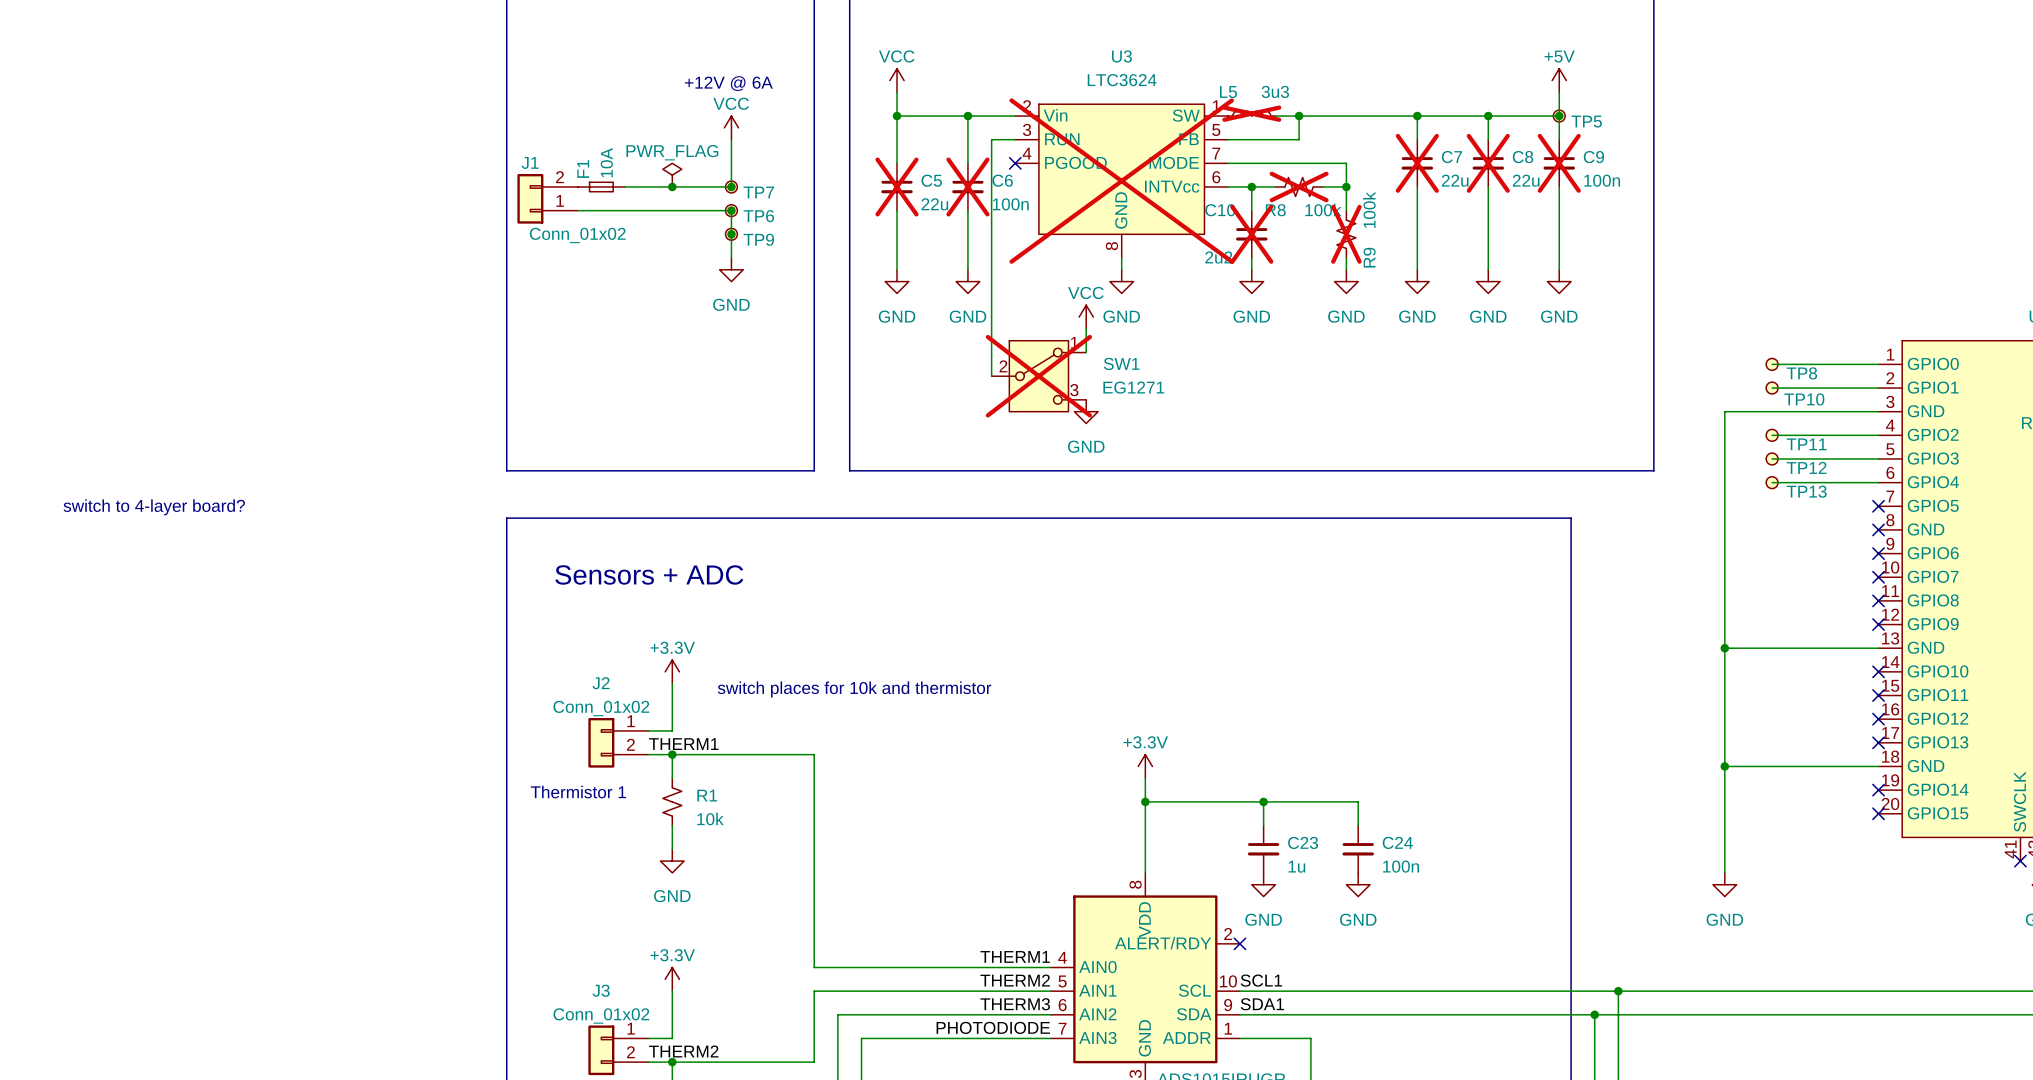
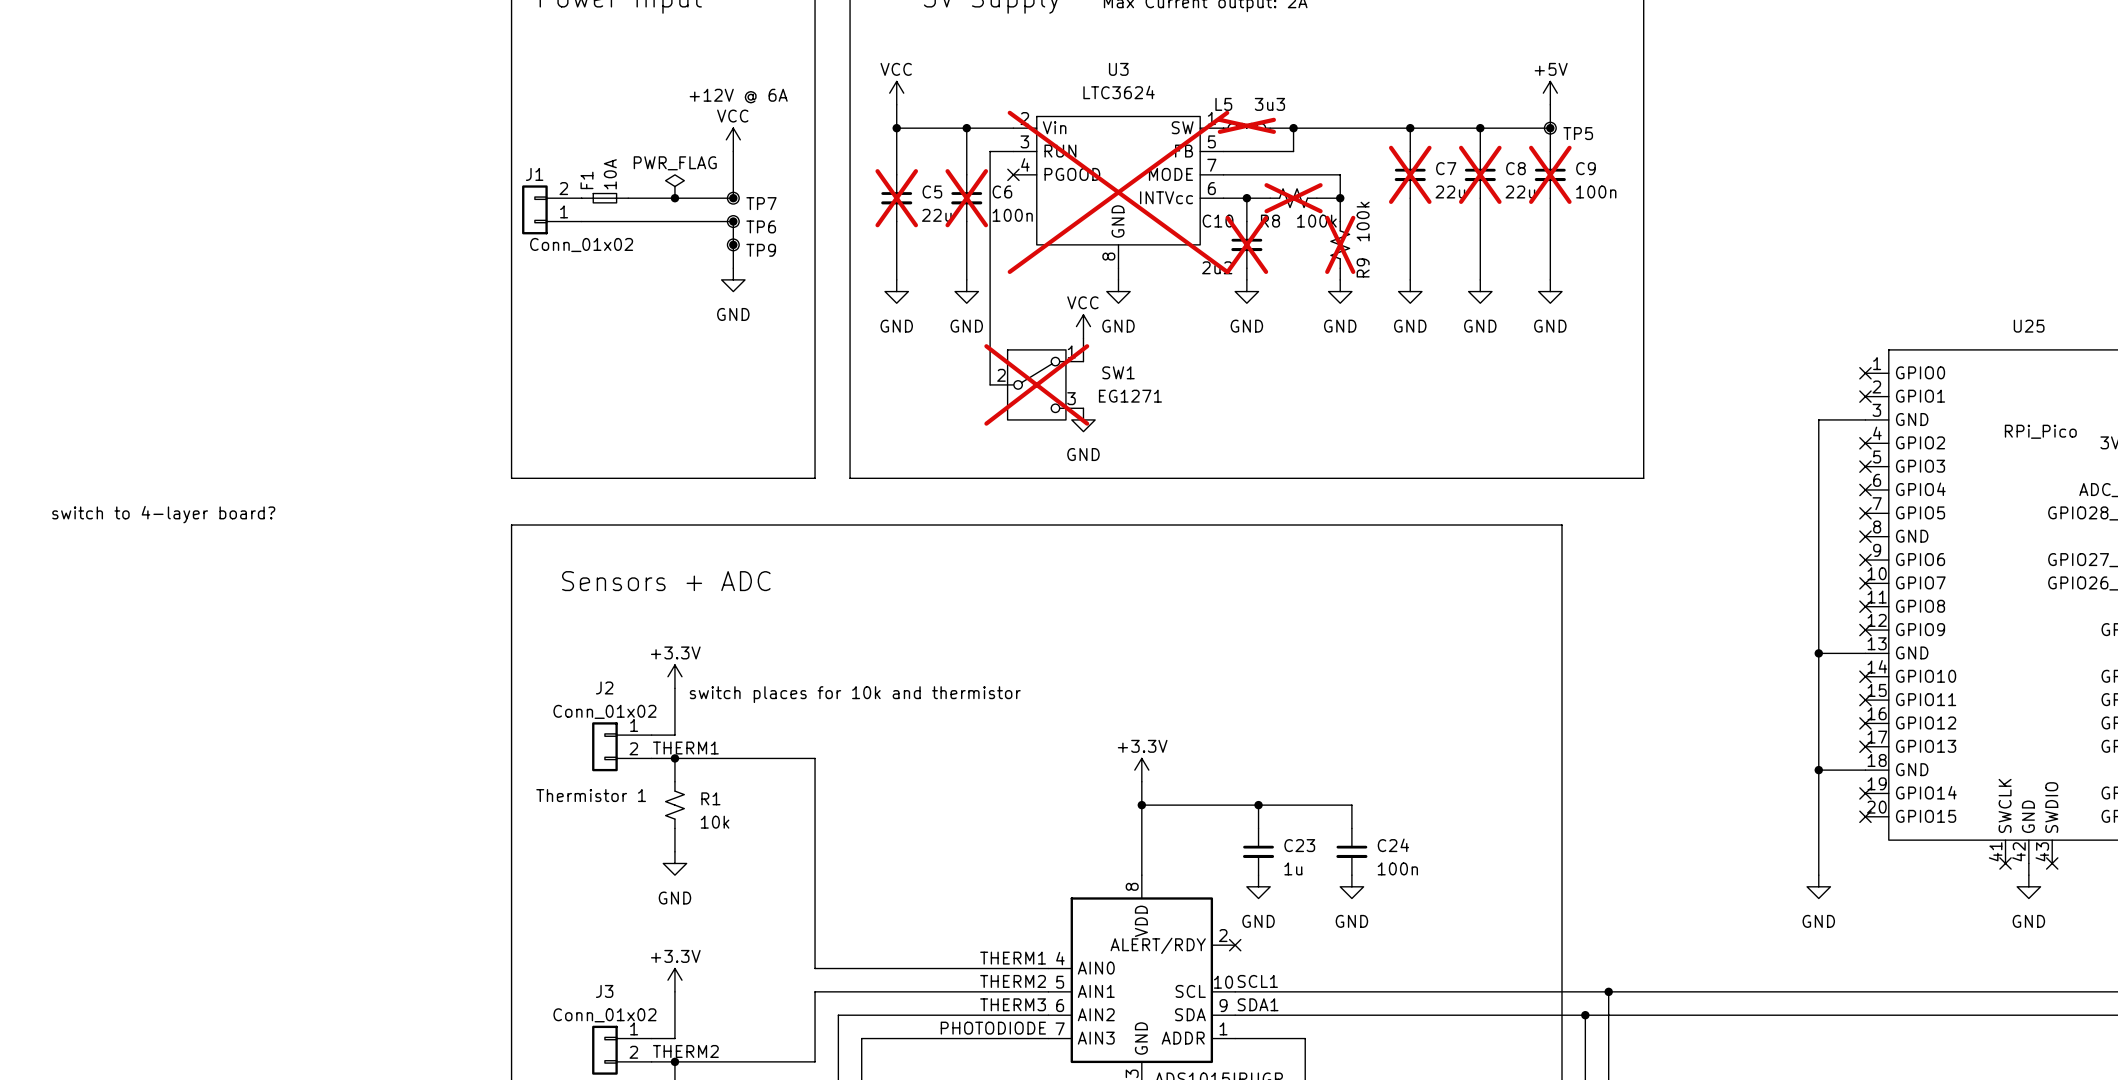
wire: (1772, 364) (1878, 364) -> none
TP8: (1772, 364) -> none
no-connect mark: none -> (1865, 373)
wire: (1772, 388) (1878, 388) -> none
TP10: (1772, 388) -> none
no-connect mark: none -> (1865, 396)
wire: (1831, 411) (1724, 411) (1724, 872) -> (1818, 419) (1818, 875)
wire: (1772, 435) (1878, 435) -> none
TP11: (1772, 435) -> none
no-connect mark: none -> (1865, 443)
wire: (1772, 458) (1878, 458) -> none
TP12: (1772, 458) -> none
no-connect mark: none -> (1865, 466)
wire: (1772, 482) (1878, 482) -> none
TP13: (1772, 482) -> none
no-connect mark: none -> (1865, 489)
wire: (1724, 648) (1831, 648) -> none
junction: (1724, 648) -> none
junction: none -> (1818, 653)
wire: (1724, 766) (1831, 766) -> none
junction: (1724, 766) -> none
junction: none -> (1818, 770)
power symbol position: GND (1724, 884) -> GND (1818, 886)

